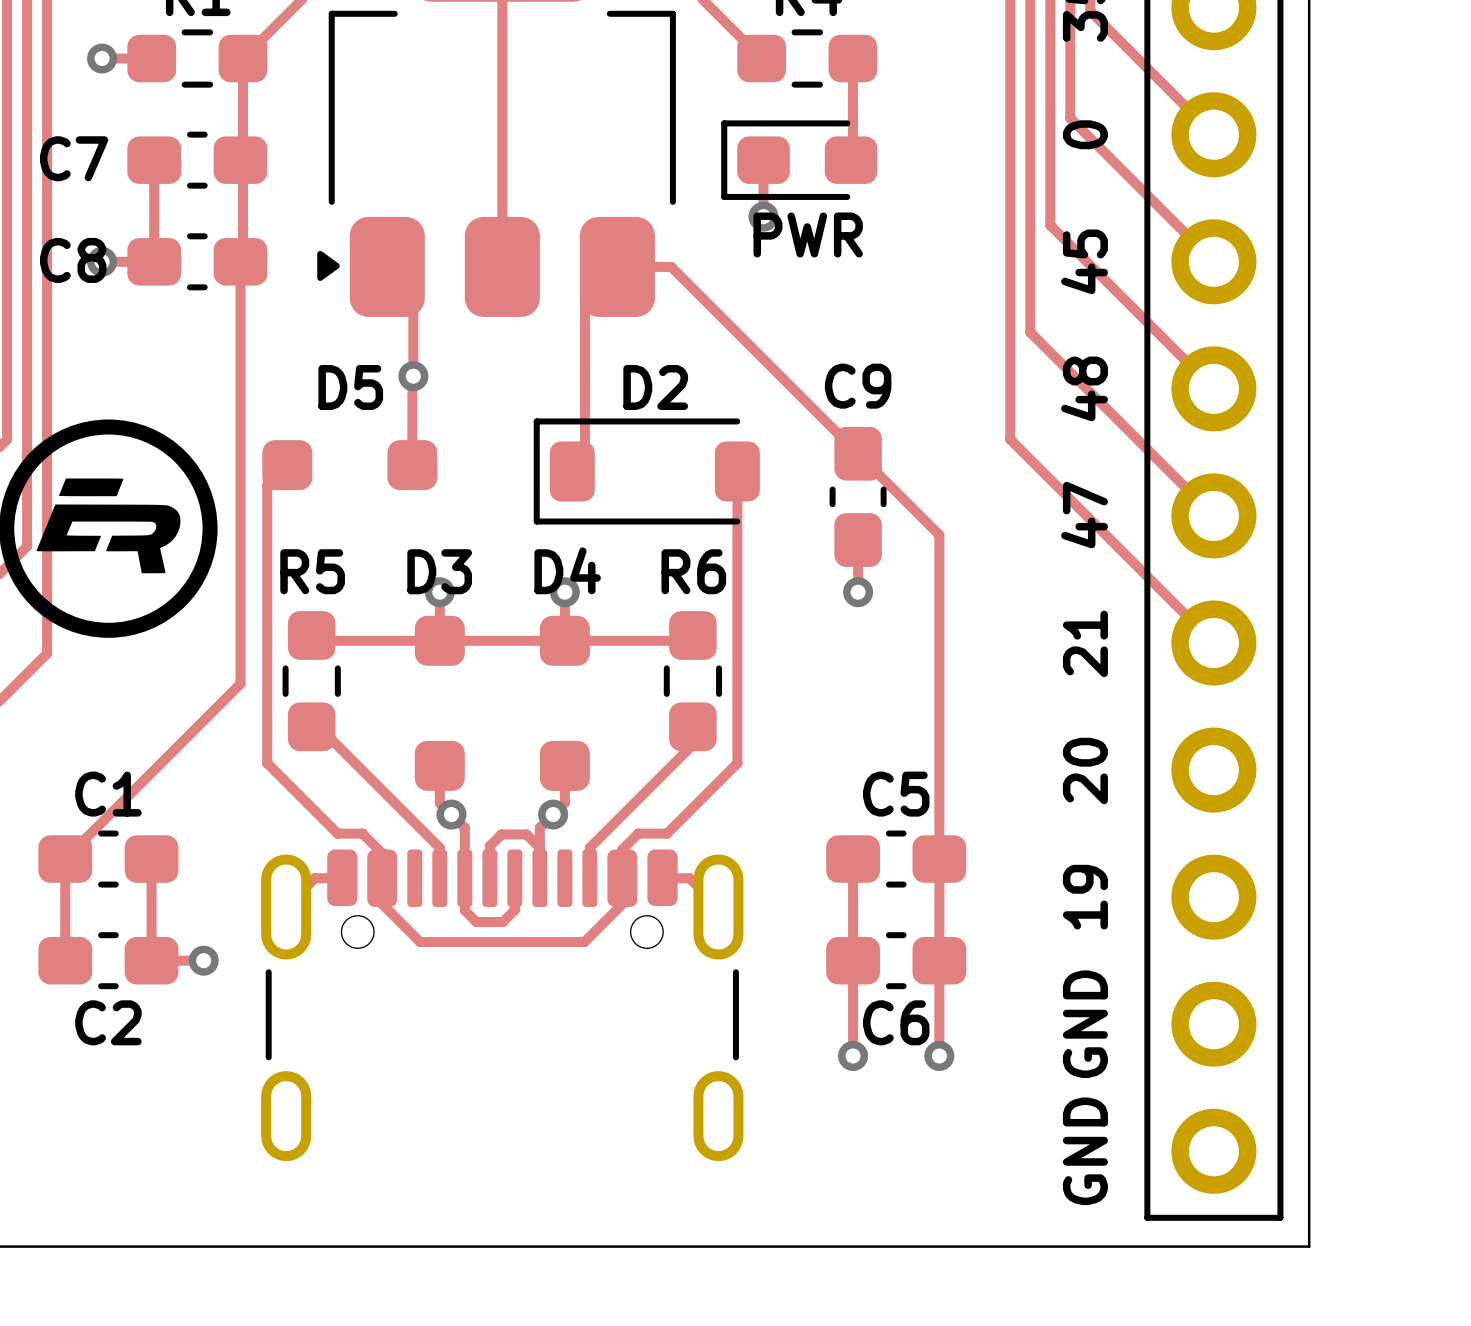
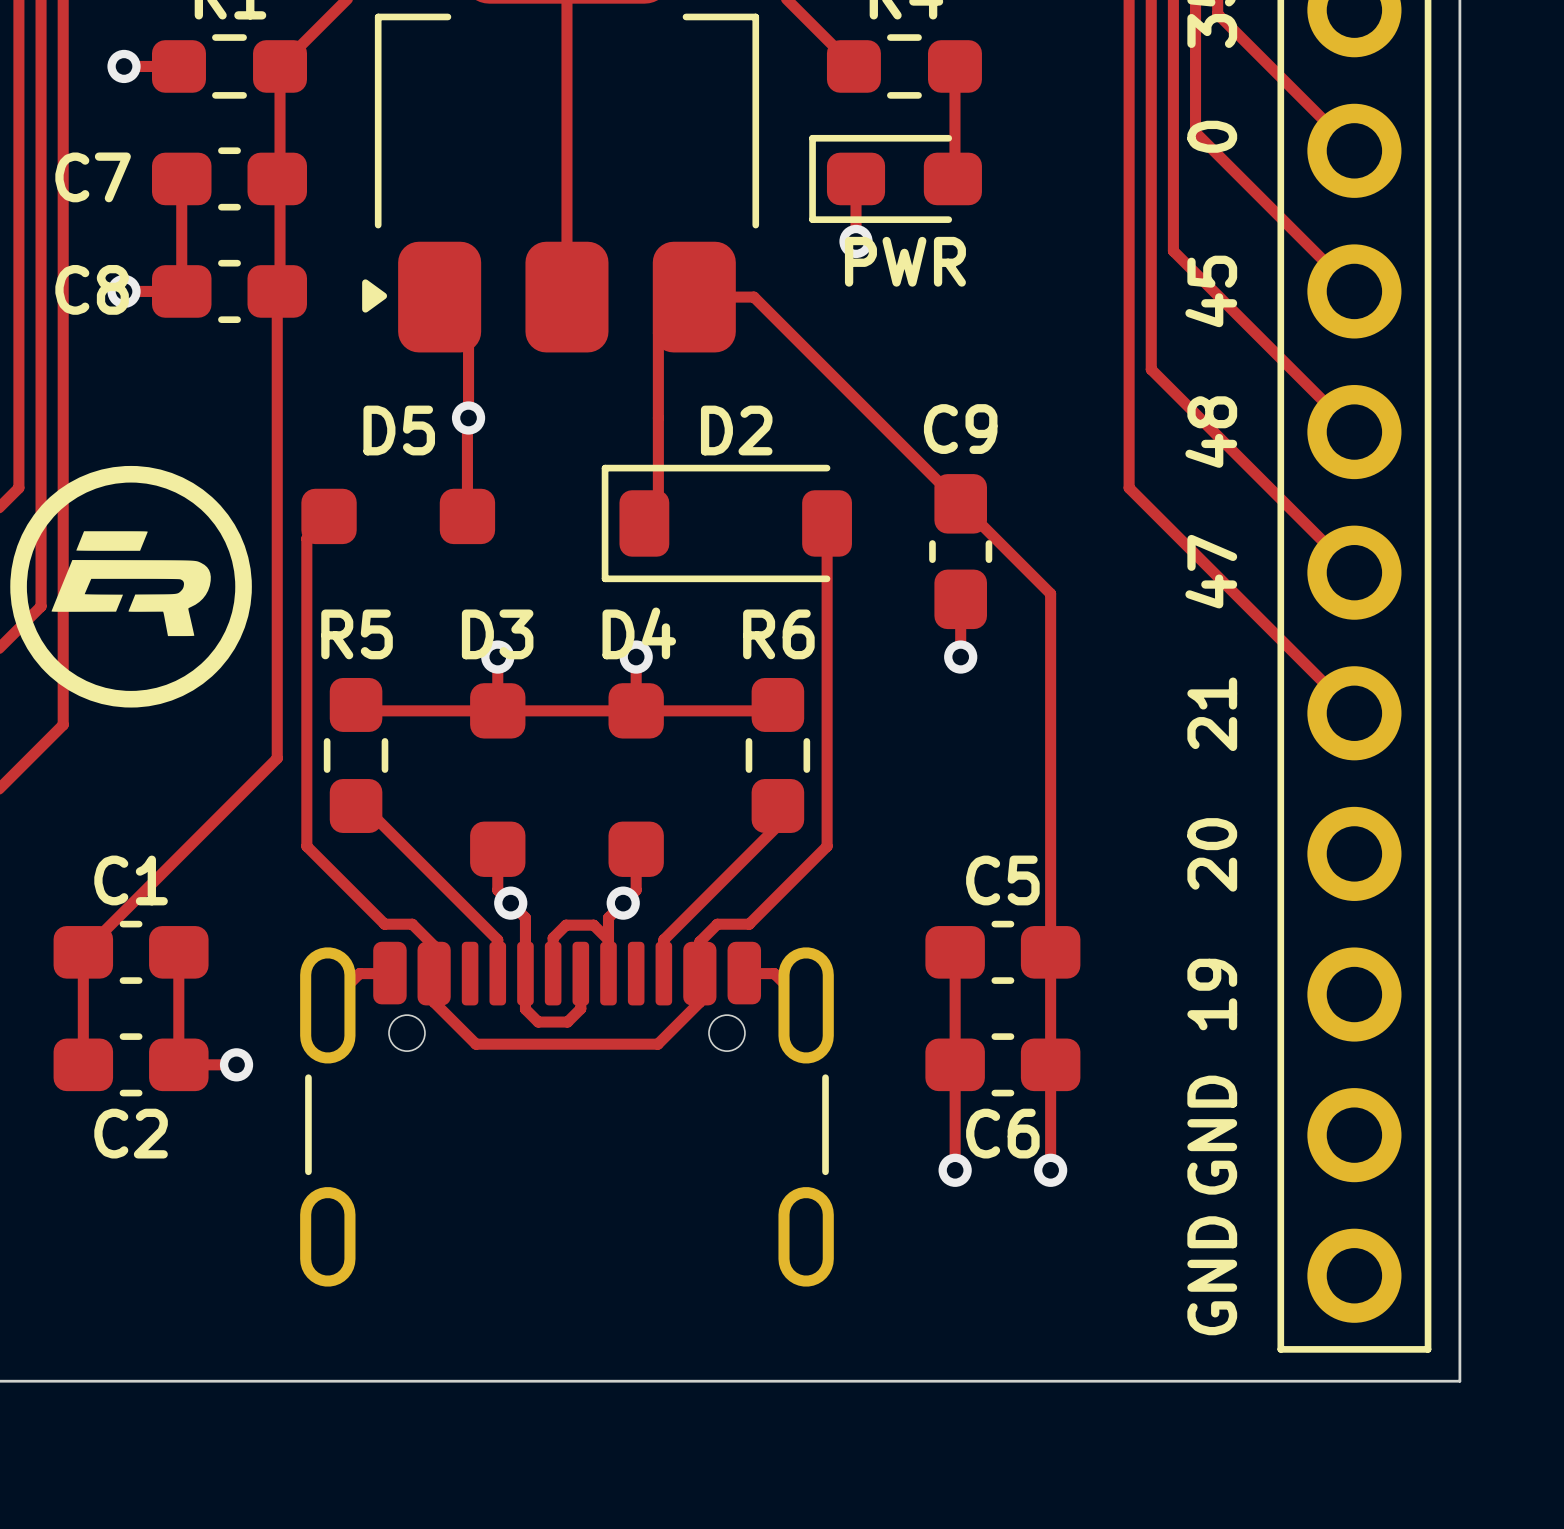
text position: 0 (1085, 134) -> 0 (1212, 136)

